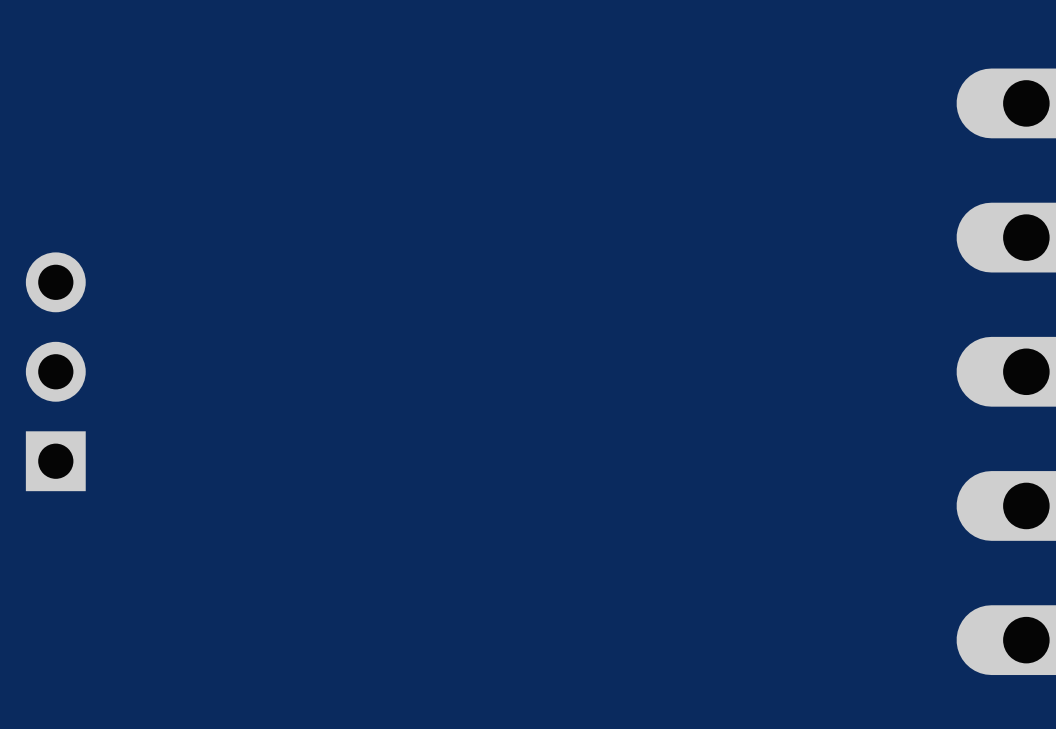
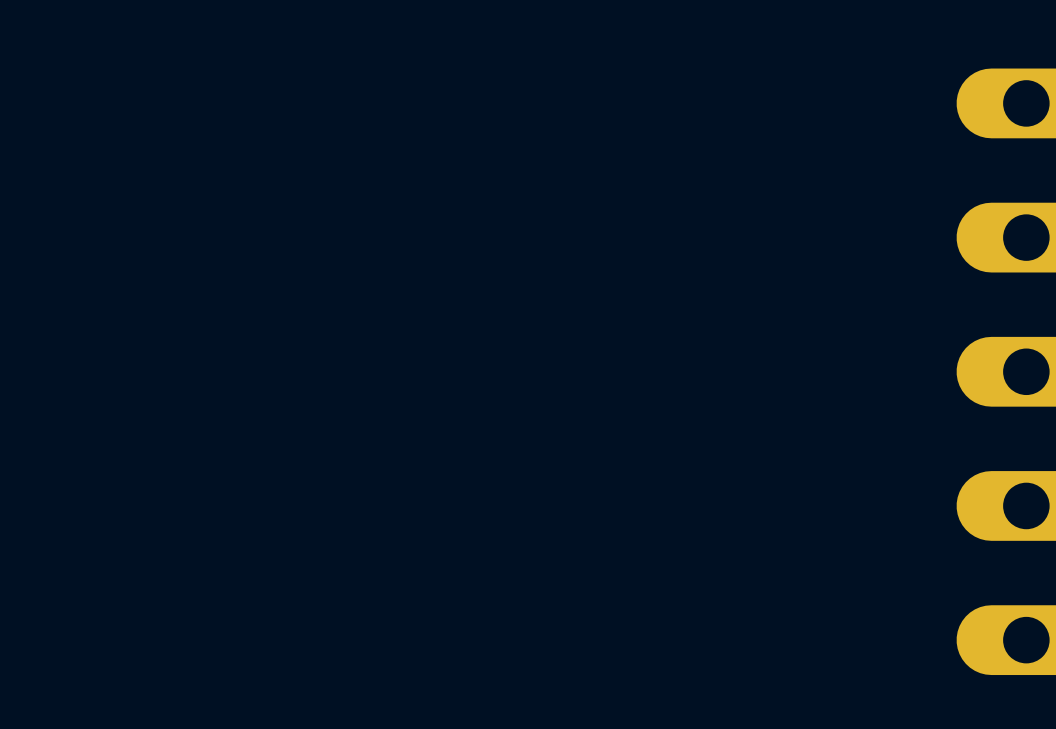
part: (55, 371) -> none

